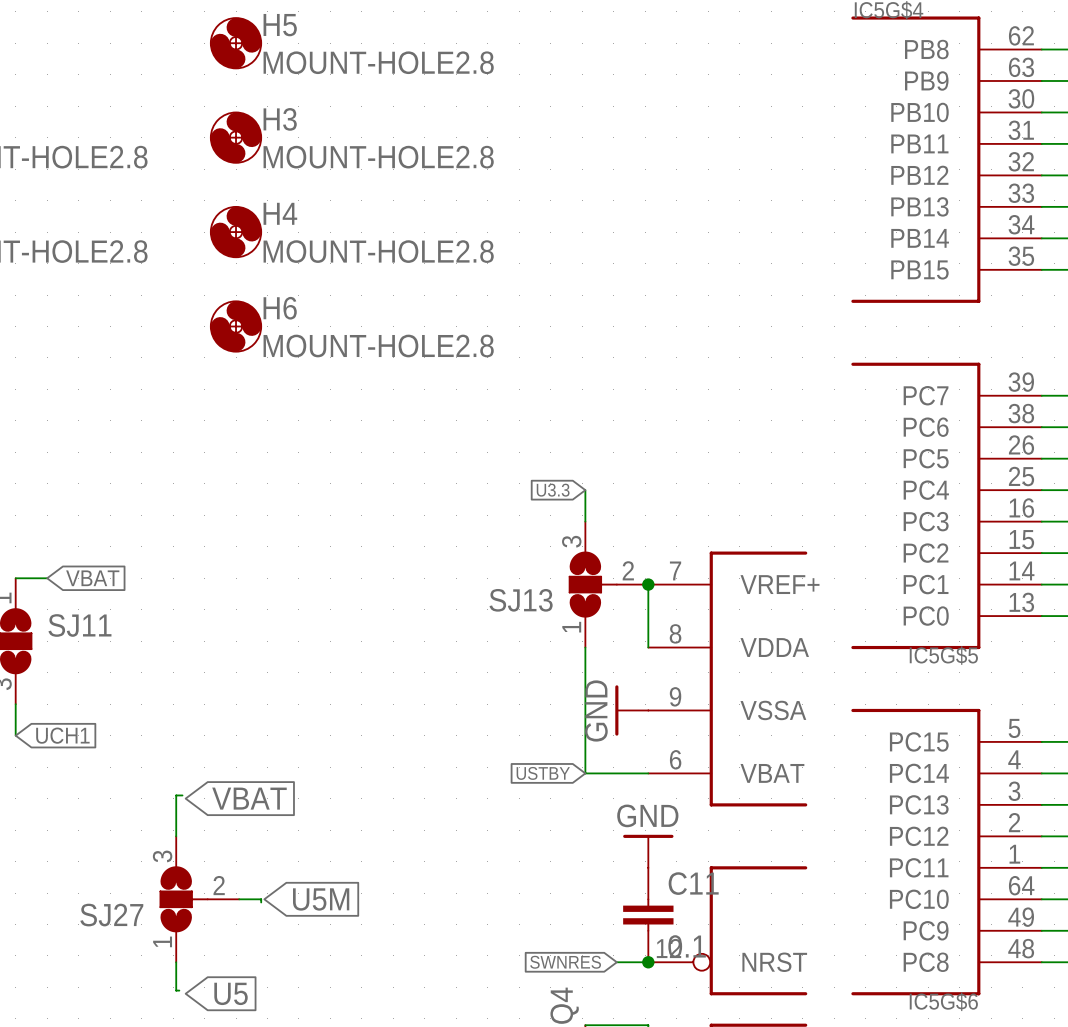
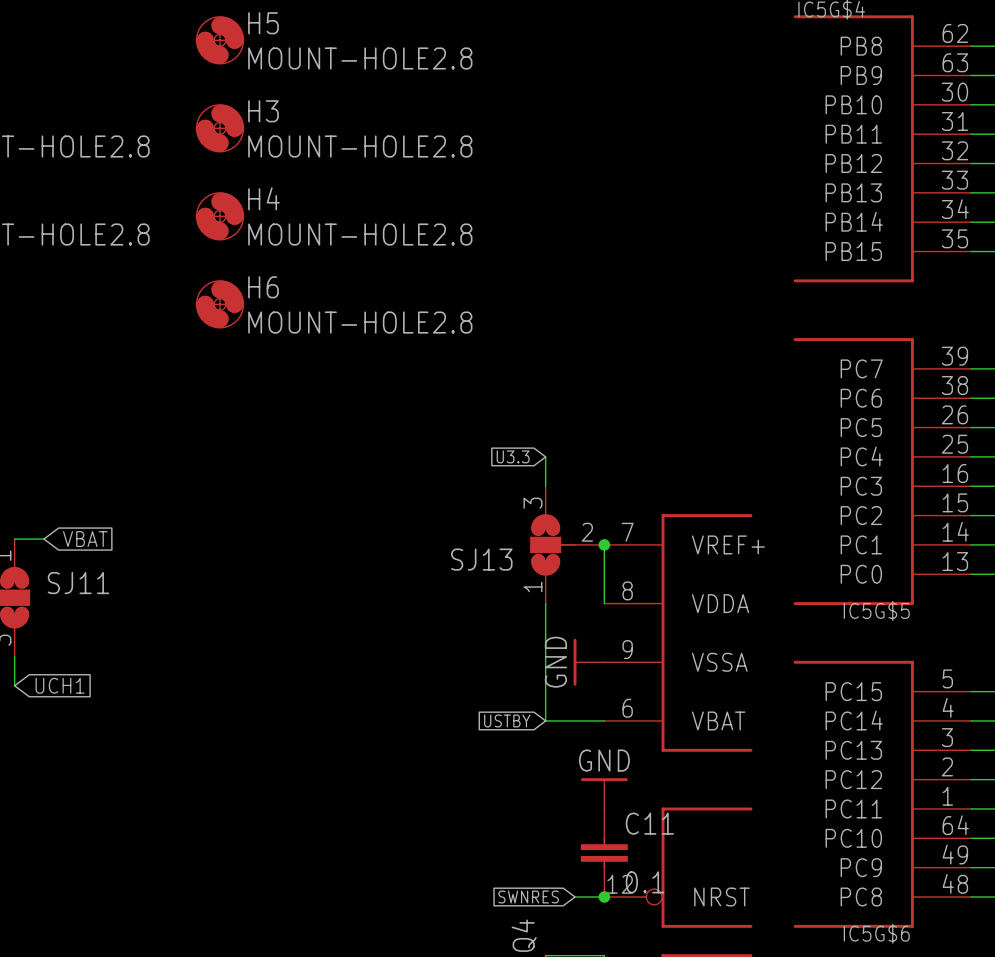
wire: (182, 795) (176, 795) (176, 836) -> none
global label: VBAT (249, 798) -> none
SJ27: (199, 899) -> none
wire: (239, 899) (261, 899) (261, 902) -> none
global label: U5M (321, 899) -> none
wire: (176, 962) (176, 990) (179, 990) -> none
global label: U5 (231, 993) -> none

